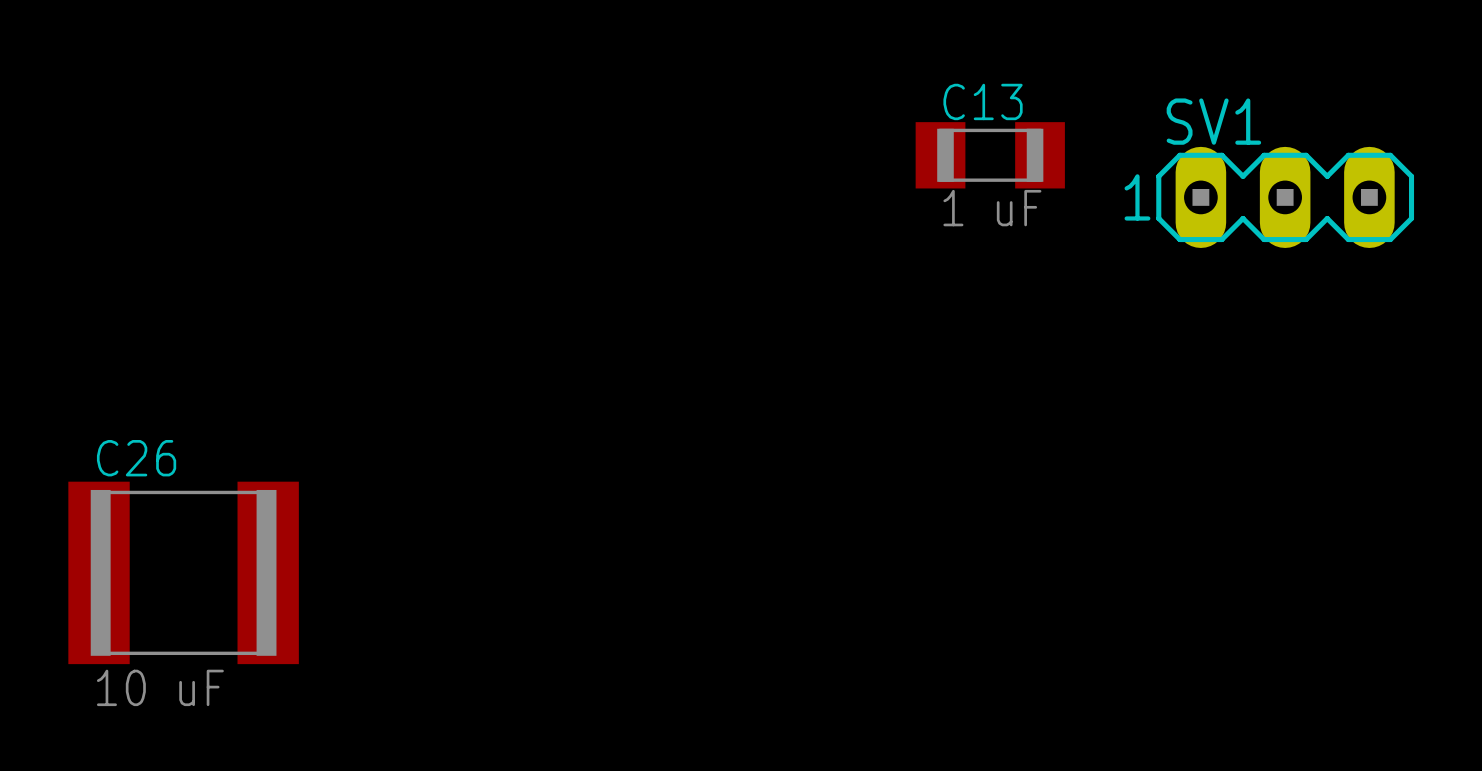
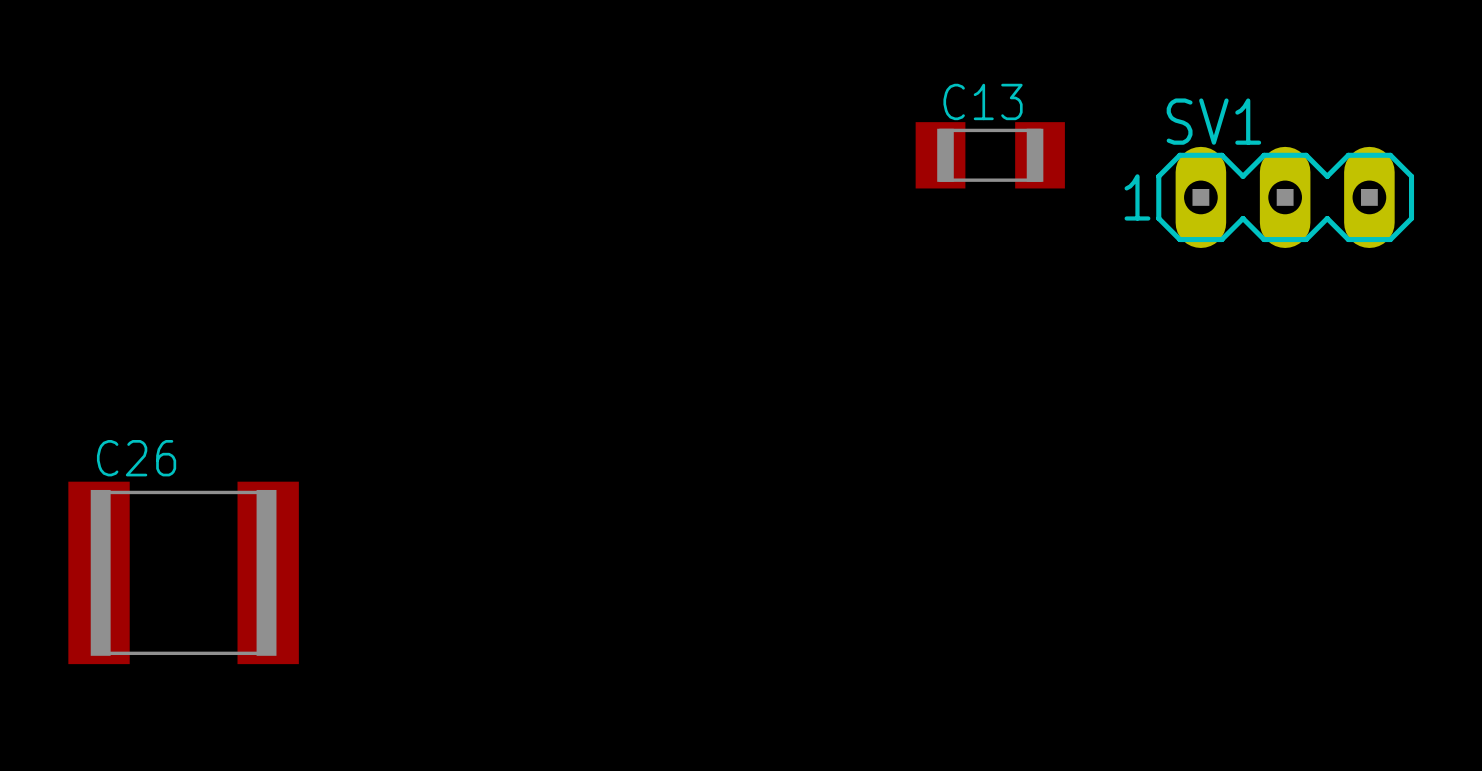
C13 value: 1 uF (992, 208) -> none
C26 value: 10 uF (160, 687) -> none

